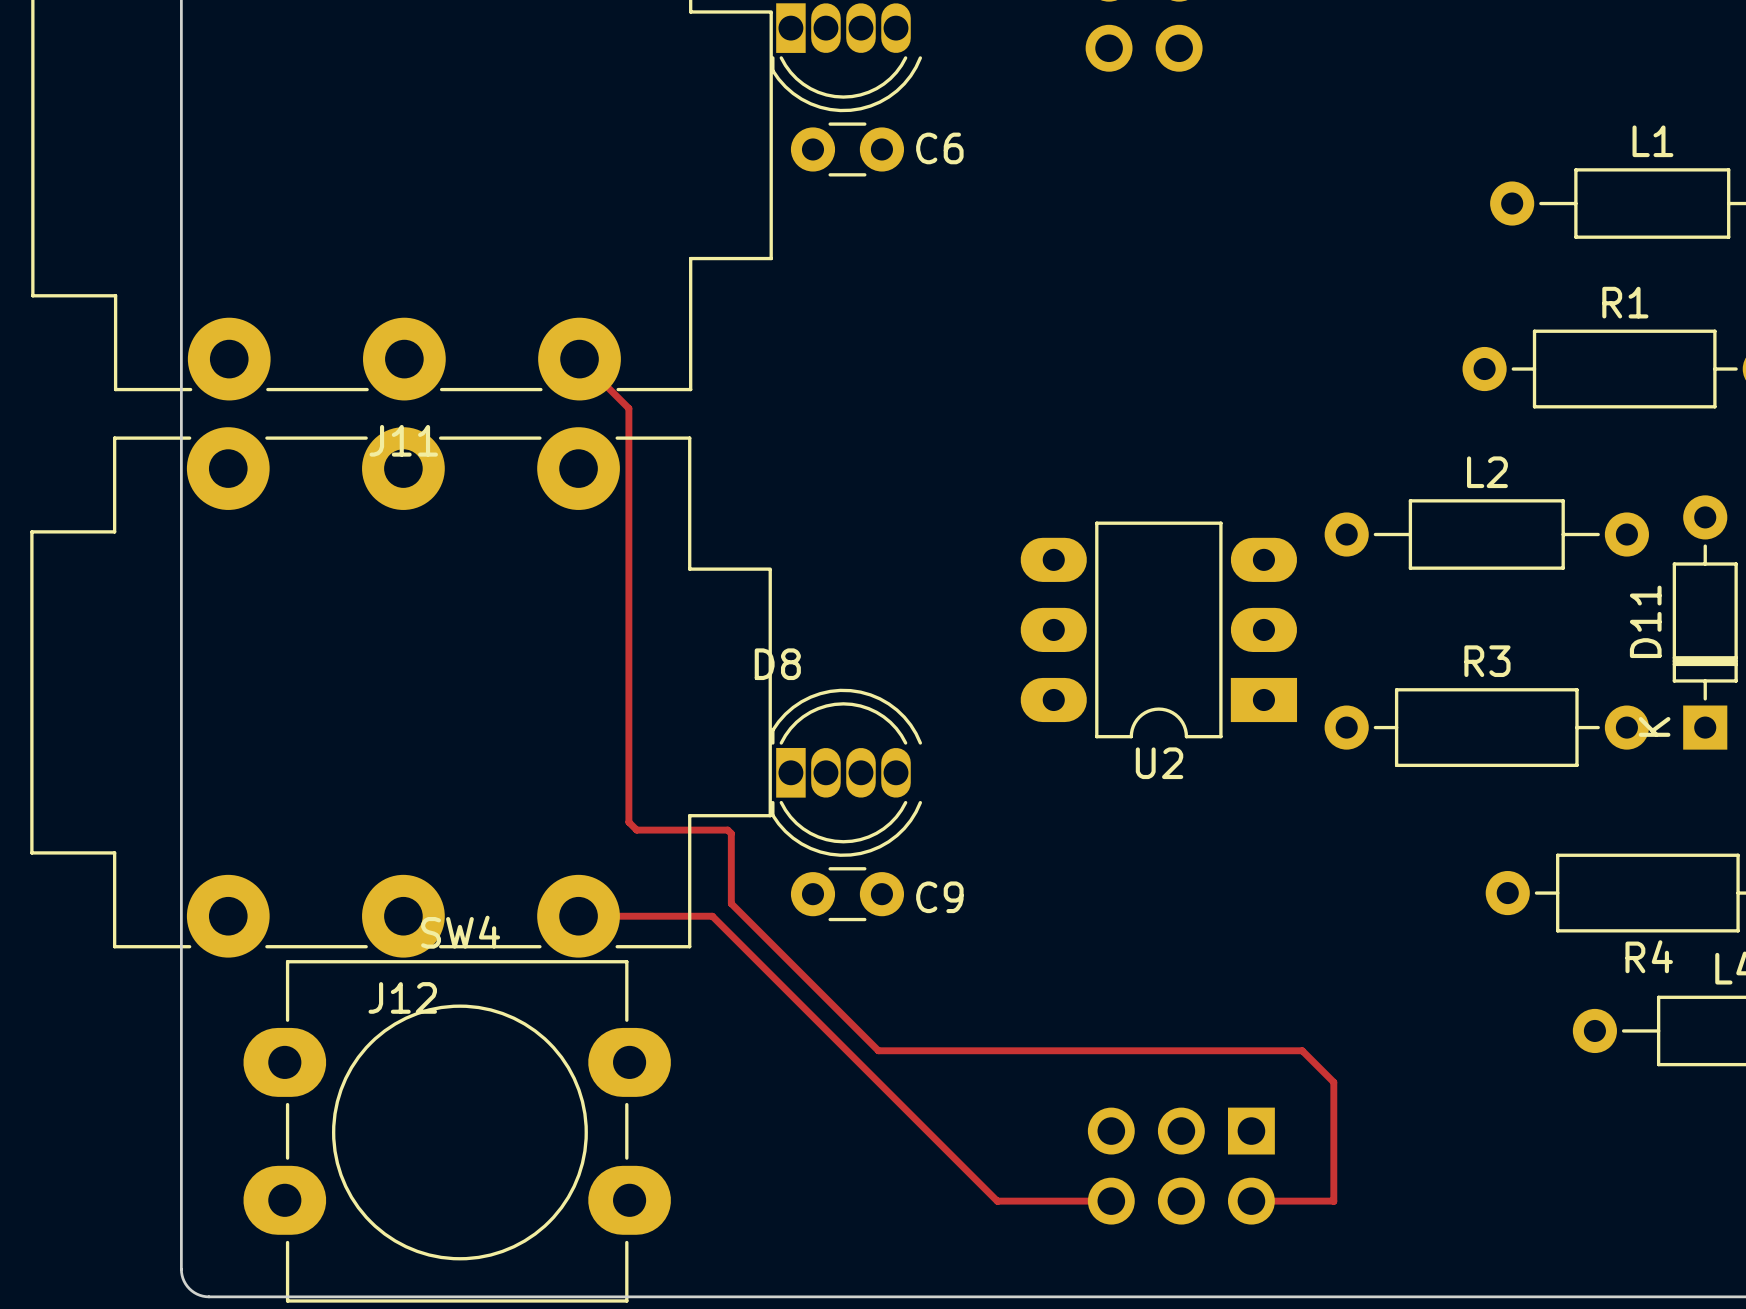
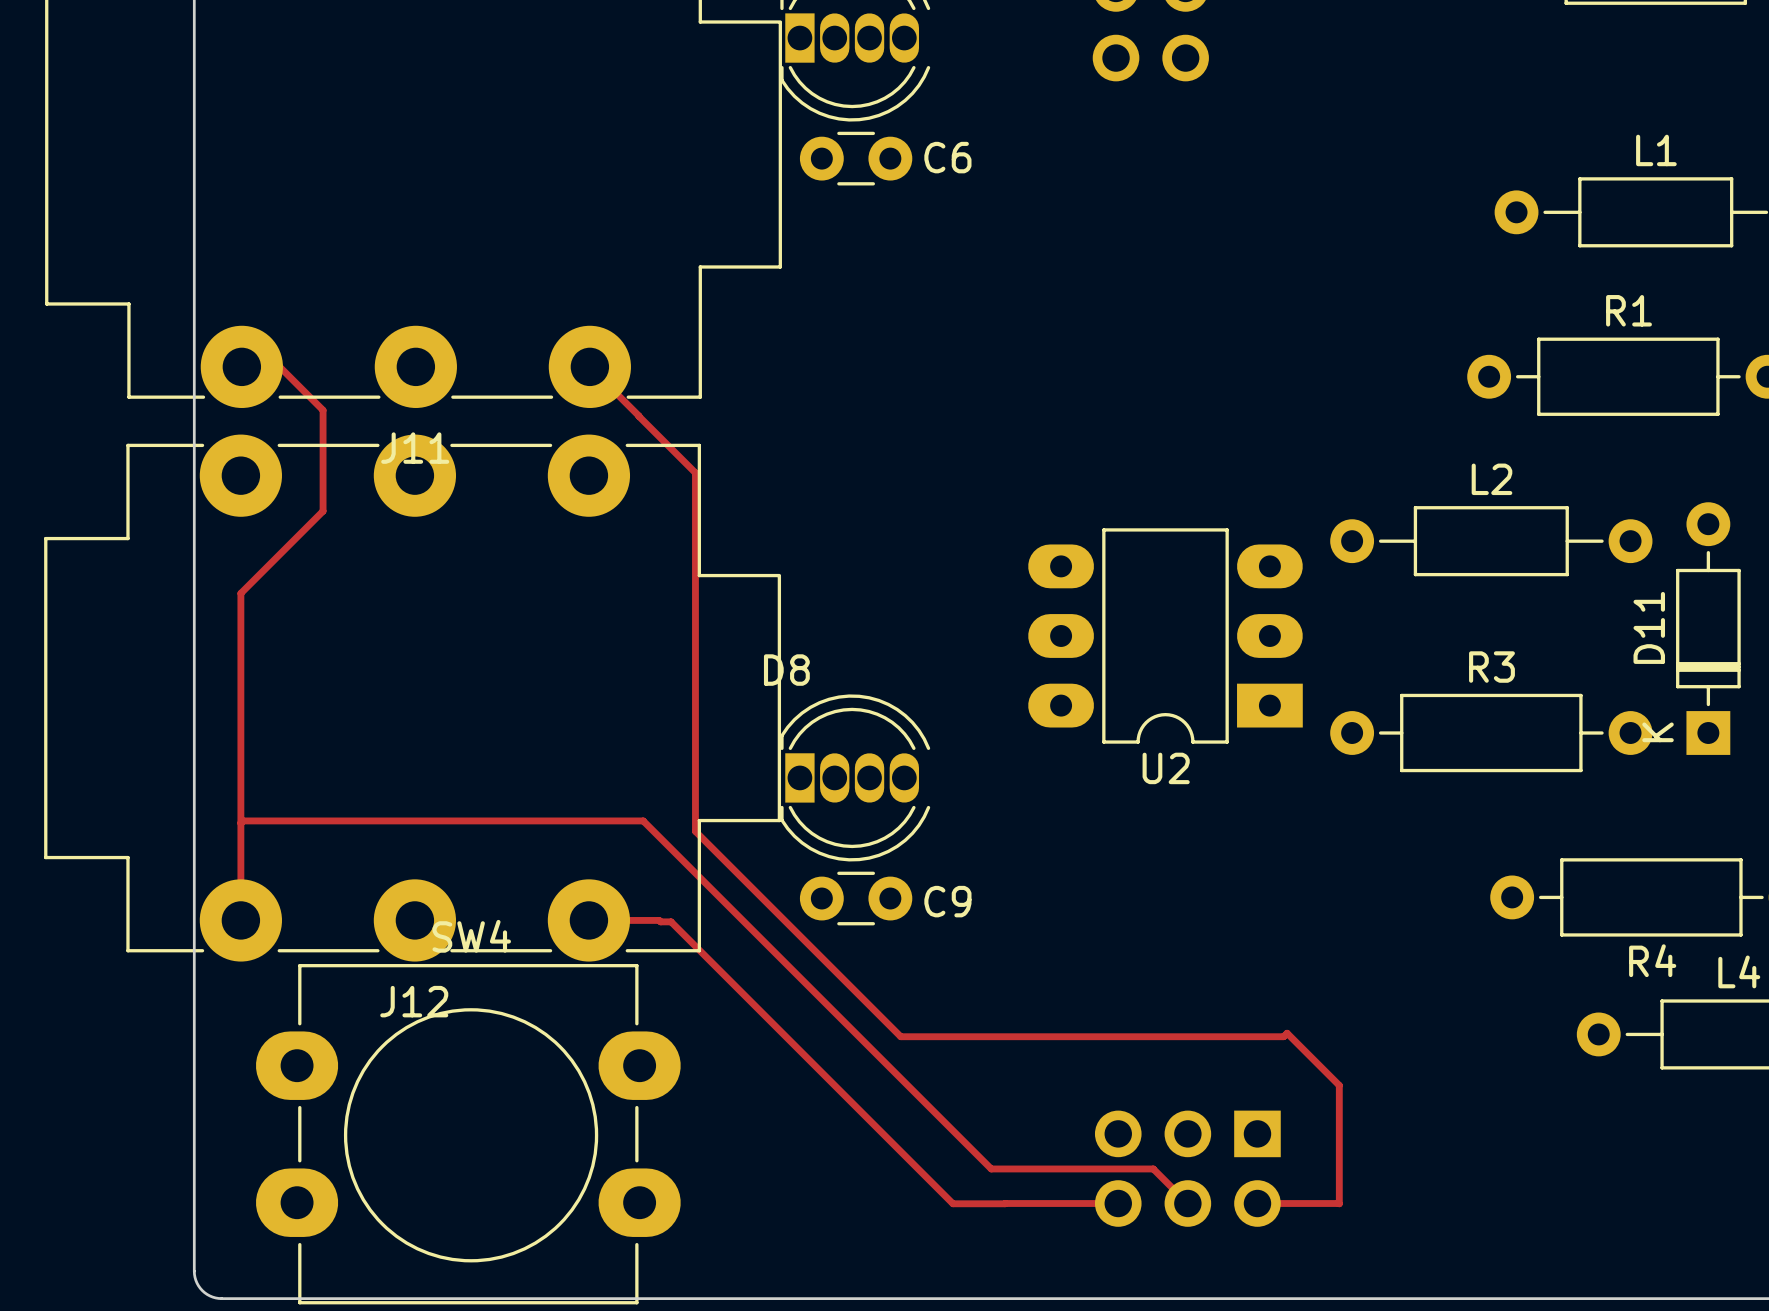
track: none -> (241, 366) (279, 366) (323, 410) (323, 511) (240, 593) (240, 920)
track: (628, 408) (628, 822) (636, 830) (727, 830) (731, 833) (731, 903) (878, 1050) (1302, 1050) -> (638, 416) (695, 472) (695, 831) (900, 1036) (1283, 1036) (1287, 1033) (1308, 1054)
track: none -> (240, 823) (243, 820) (643, 820) (991, 1168) (1153, 1168) (1187, 1203)
track: (649, 916) (712, 916) (997, 1201) -> (659, 920) (671, 921) (953, 1203) (1005, 1203)

